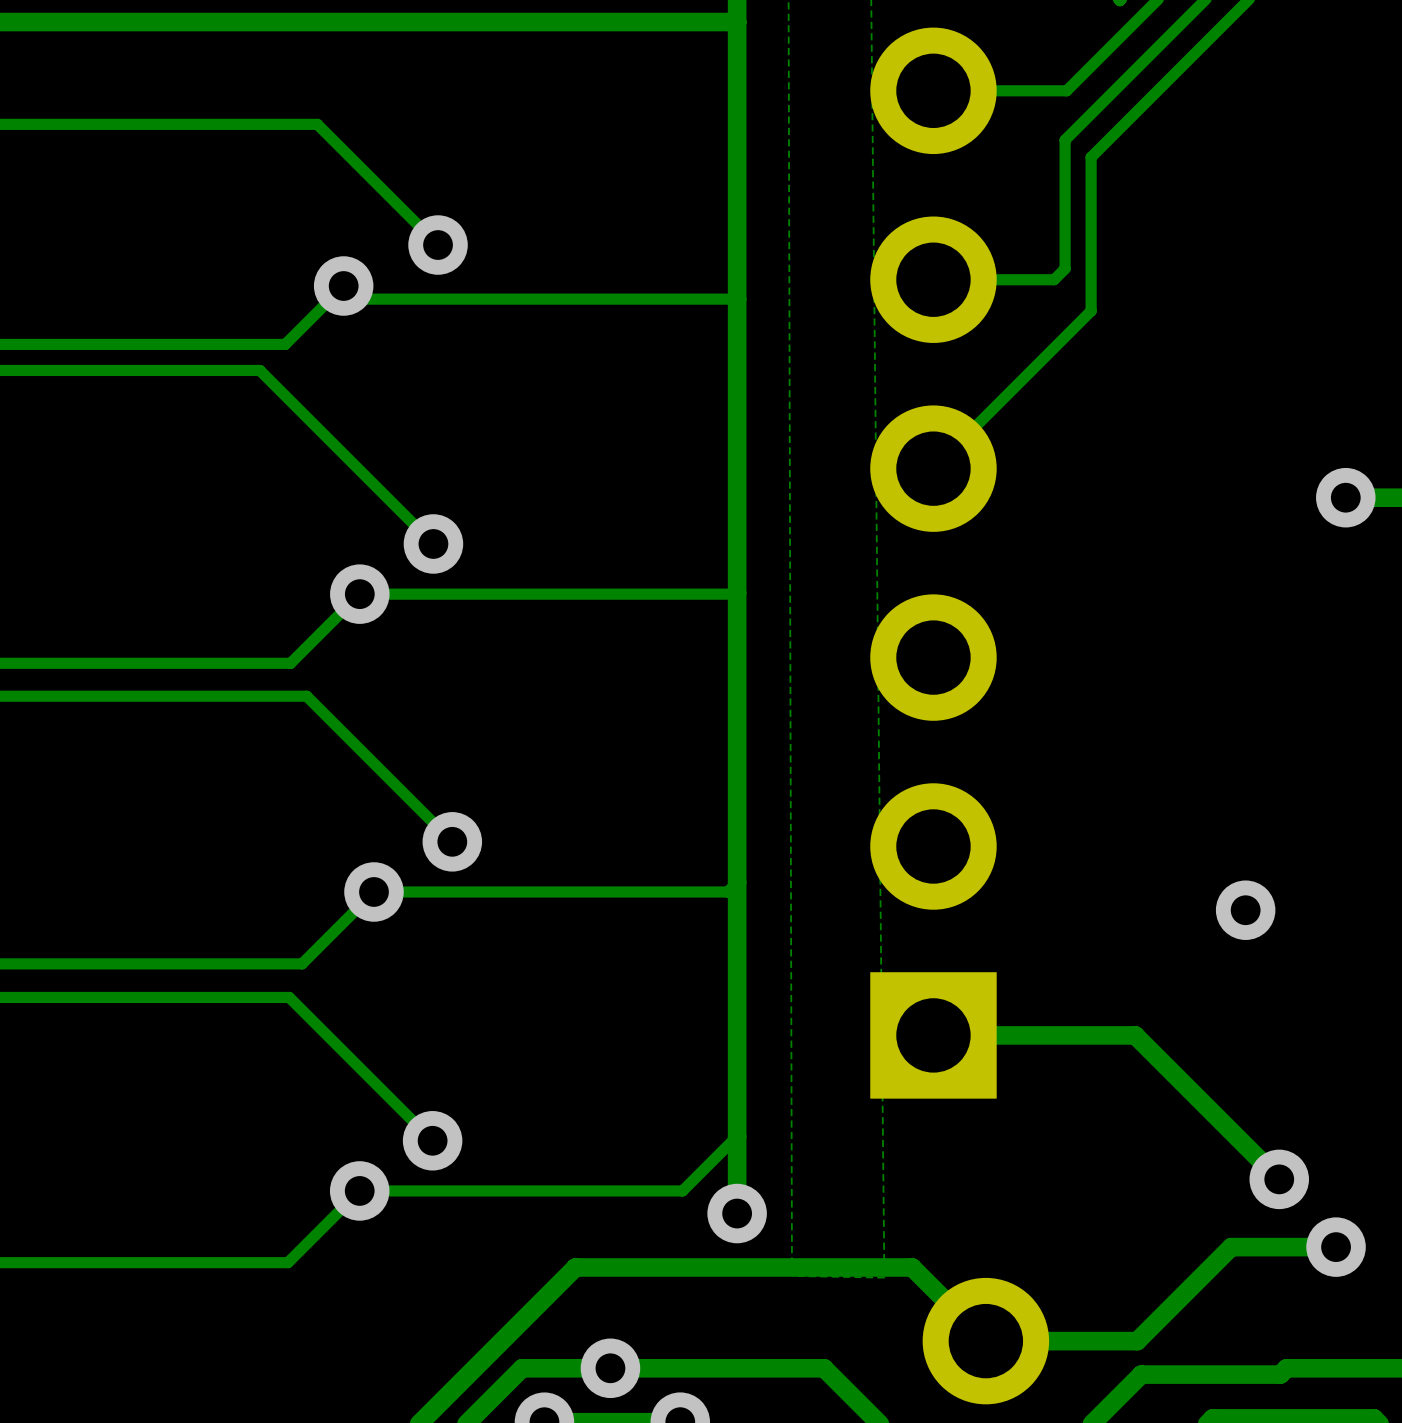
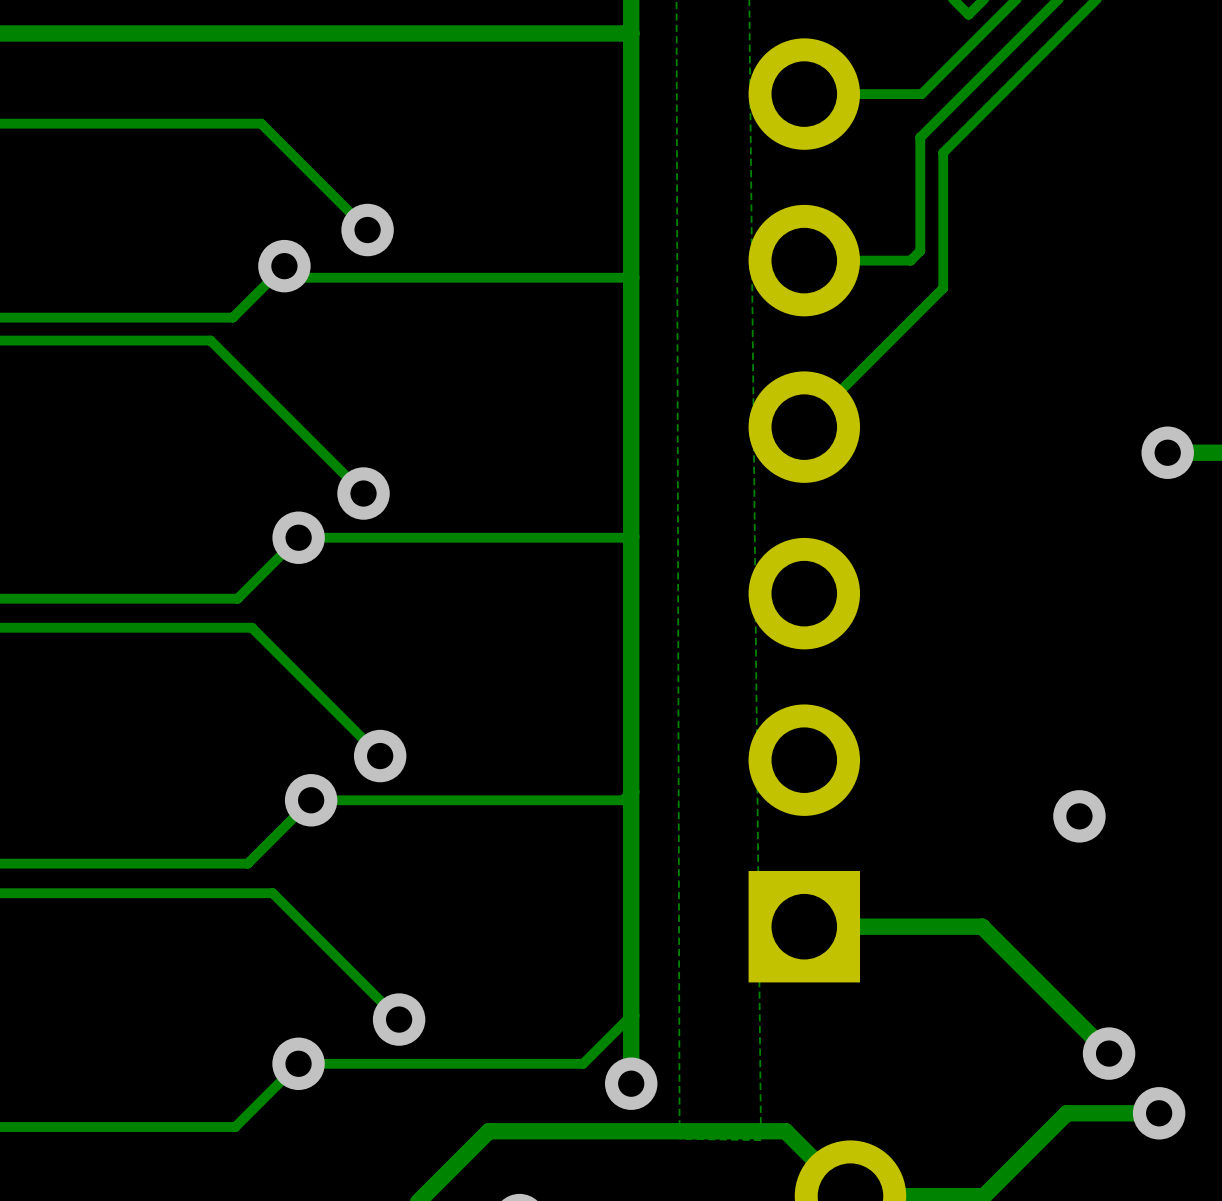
track: (289, 997) (432, 1140) -> (236, 893) (272, 893) (399, 1019)
via position: (432, 1140) -> (399, 1019)

